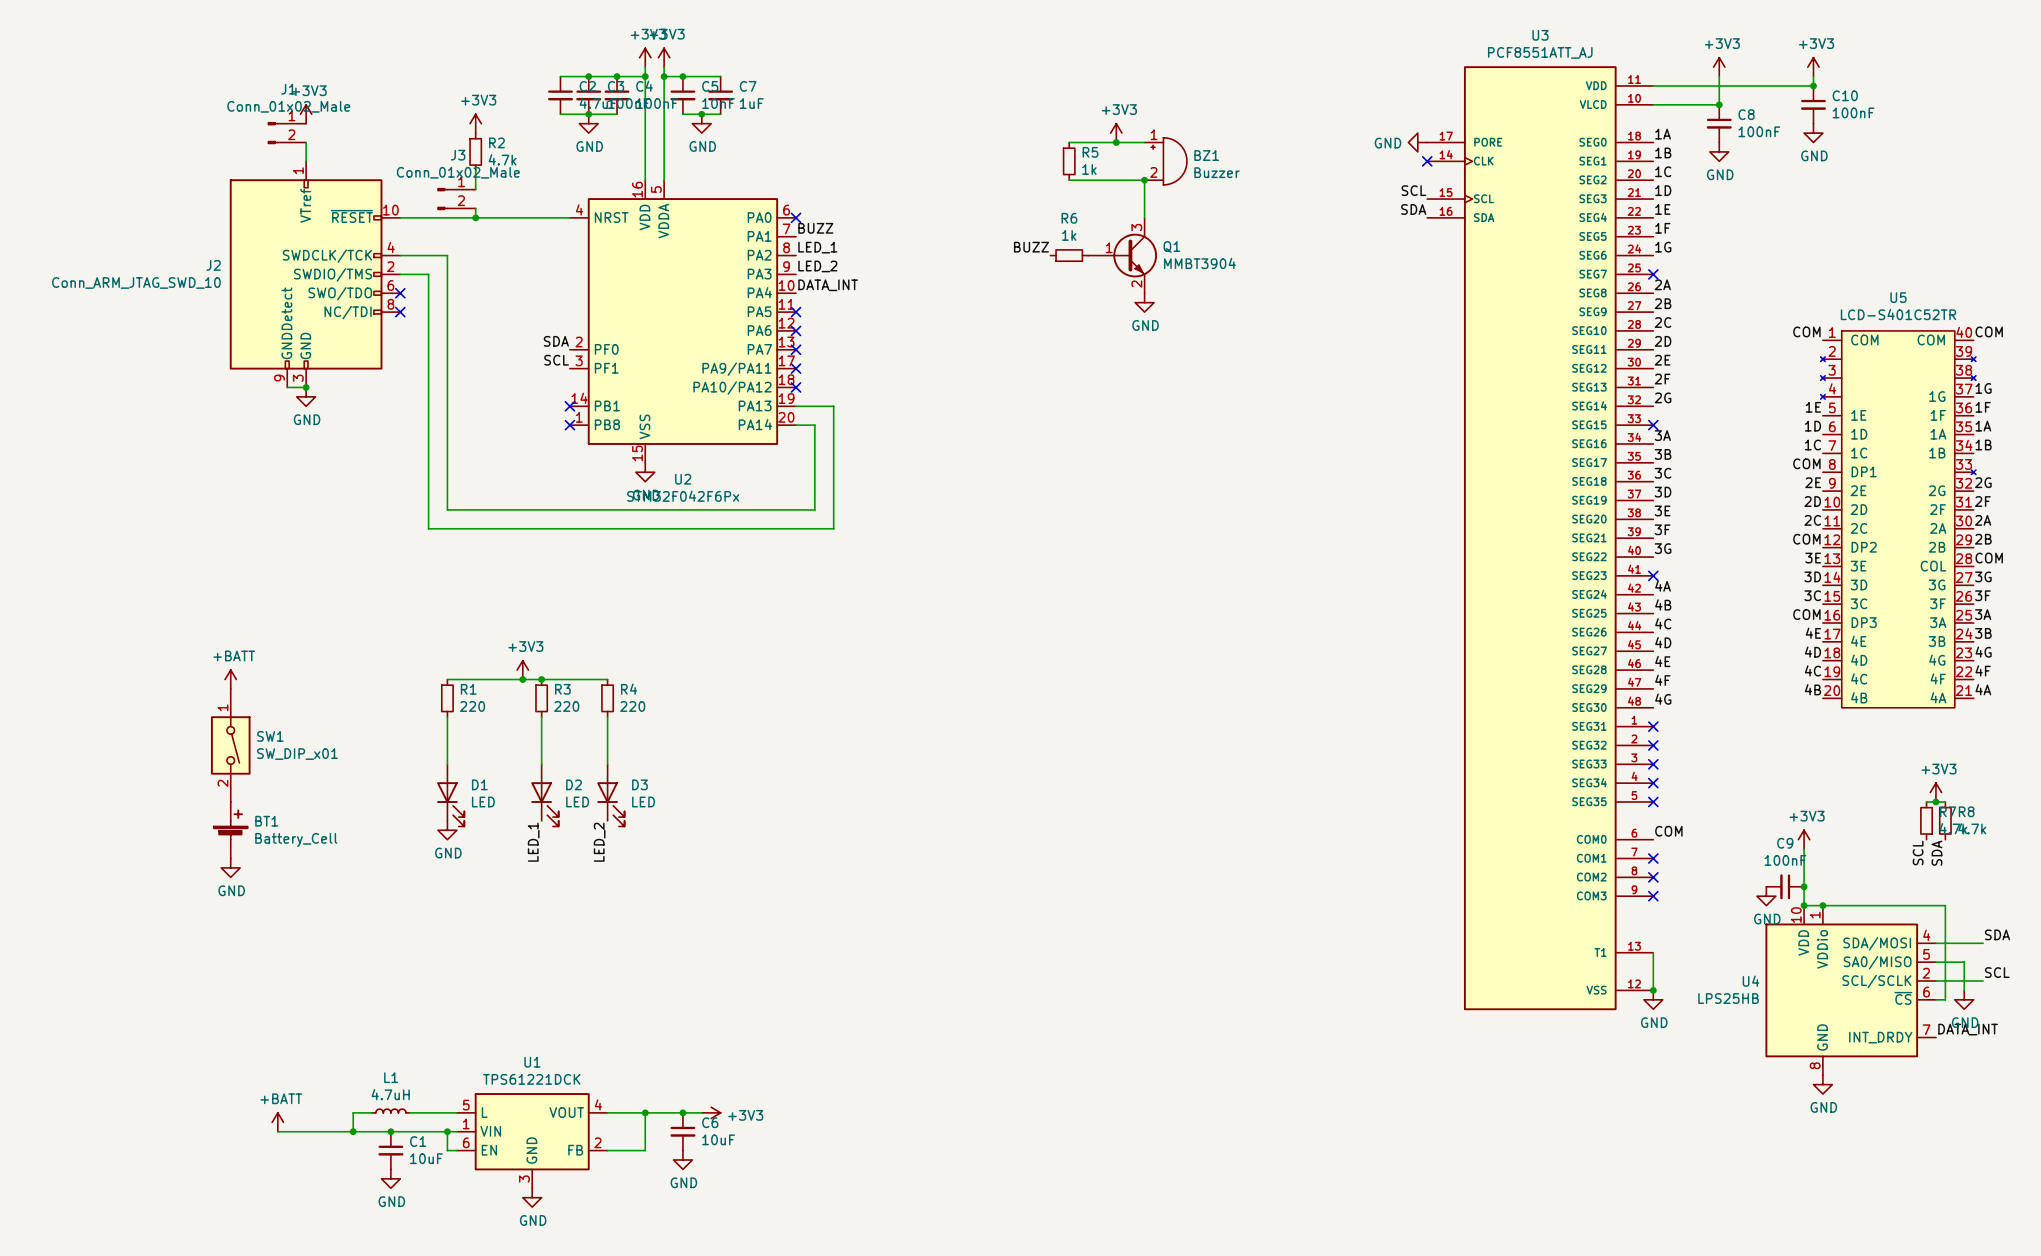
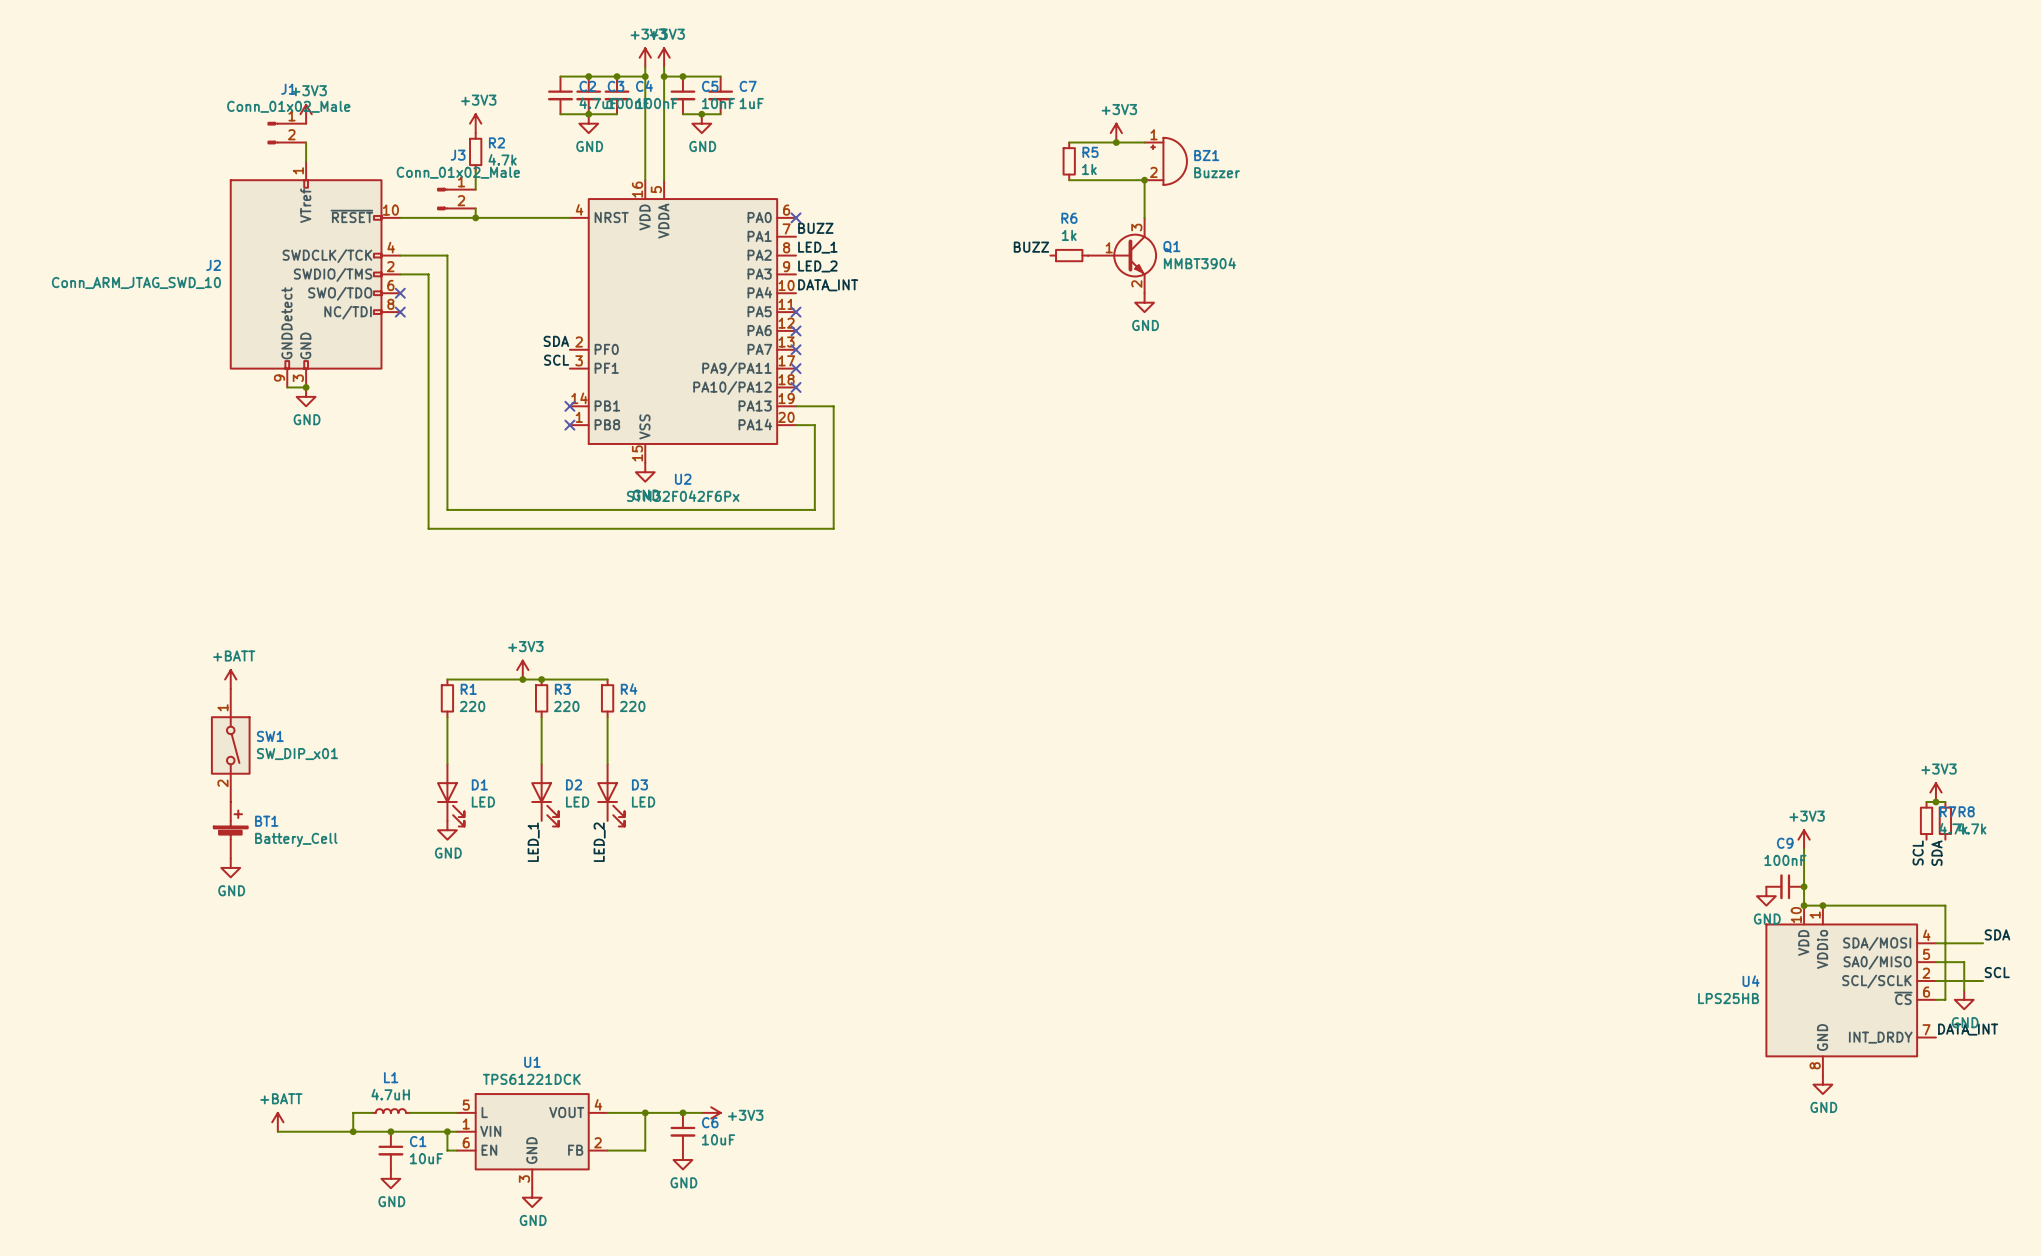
power symbol: +3V3 (1719, 67) -> none
power symbol: +3V3 (1813, 67) -> none
wire: (1719, 76) (1719, 104) (1653, 104) -> none
wire: (1813, 76) (1813, 85) (1653, 85) -> none
junction: (1813, 85) -> none
junction: (1719, 104) -> none
C10: 100nF (1813, 104) -> none
C8: 100nF (1719, 123) -> none
power symbol: GND (1813, 133) -> none
label: 1A (1663, 134) -> none
power symbol: GND (1417, 142) -> none
power symbol: GND (1719, 151) -> none
label: 1B (1663, 152) -> none
no-connect mark: (1427, 161) -> none
label: 1C (1663, 171) -> none
label: SCL (1413, 190) -> none
label: 1D (1663, 190) -> none
label: SDA (1413, 209) -> none
label: 1E (1662, 209) -> none
label: 1F (1662, 228) -> none
label: 1G (1663, 247) -> none
no-connect mark: (1653, 274) -> none
label: 2A (1662, 284) -> none
label: 2B (1663, 303) -> none
label: 2C (1663, 322) -> none
label: COM (1806, 331) -> none
label: COM (1989, 331) -> none
label: 2D (1663, 341) -> none
label: 2E (1662, 360) -> none
label: 2F (1662, 379) -> none
label: 1G (1983, 388) -> none
label: 2G (1663, 397) -> none
label: 1E (1813, 407) -> none
label: 1F (1983, 407) -> none
no-connect mark: (1653, 425) -> none
label: 1D (1812, 426) -> none
label: 1A (1983, 426) -> none
label: 3A (1662, 435) -> none
label: 1C (1812, 445) -> none
label: 1B (1983, 445) -> none
label: 3B (1663, 454) -> none
label: COM (1806, 463) -> none
label: 3C (1663, 473) -> none
label: 2E (1813, 482) -> none
label: 2G (1983, 482) -> none
label: 3D (1663, 492) -> none
label: 2D (1812, 501) -> none
label: 2F (1982, 501) -> none
label: 3E (1662, 510) -> none
U5: LCD-S401C52TR (1898, 519) -> none
label: 2C (1812, 520) -> none
label: 2A (1983, 520) -> none
label: 3F (1662, 529) -> none
U3: PCF8551ATT_AJ (1540, 538) -> none
label: COM (1806, 539) -> none
label: 2B (1983, 539) -> none
label: 3G (1663, 548) -> none
label: 3E (1813, 558) -> none
label: COM (1989, 558) -> none
no-connect mark: (1653, 575) -> none
label: 3D (1812, 576) -> none
label: 3G (1983, 576) -> none
label: 4A (1663, 586) -> none
label: 3C (1812, 595) -> none
label: 3F (1982, 595) -> none
label: 4B (1663, 604) -> none
label: COM (1806, 614) -> none
label: 3A (1983, 614) -> none
label: 4C (1663, 623) -> none
label: 4E (1813, 633) -> none
label: 3B (1983, 633) -> none
label: 4D (1663, 642) -> none
label: 4D (1812, 652) -> none
label: 4G (1983, 652) -> none
label: 4E (1662, 661) -> none
label: 4C (1812, 670) -> none
label: 4F (1983, 670) -> none
label: 4F (1662, 680) -> none
label: 4B (1812, 689) -> none
label: 4A (1983, 689) -> none
label: 4G (1663, 699) -> none
no-connect mark: (1653, 726) -> none
no-connect mark: (1653, 745) -> none
no-connect mark: (1653, 764) -> none
no-connect mark: (1653, 783) -> none
no-connect mark: (1653, 801) -> none
label: COM (1668, 831) -> none
no-connect mark: (1653, 858) -> none
no-connect mark: (1653, 877) -> none
no-connect mark: (1653, 896) -> none
wire: (1653, 952) (1653, 990) -> none
junction: (1653, 990) -> none
power symbol: GND (1653, 999) -> none

